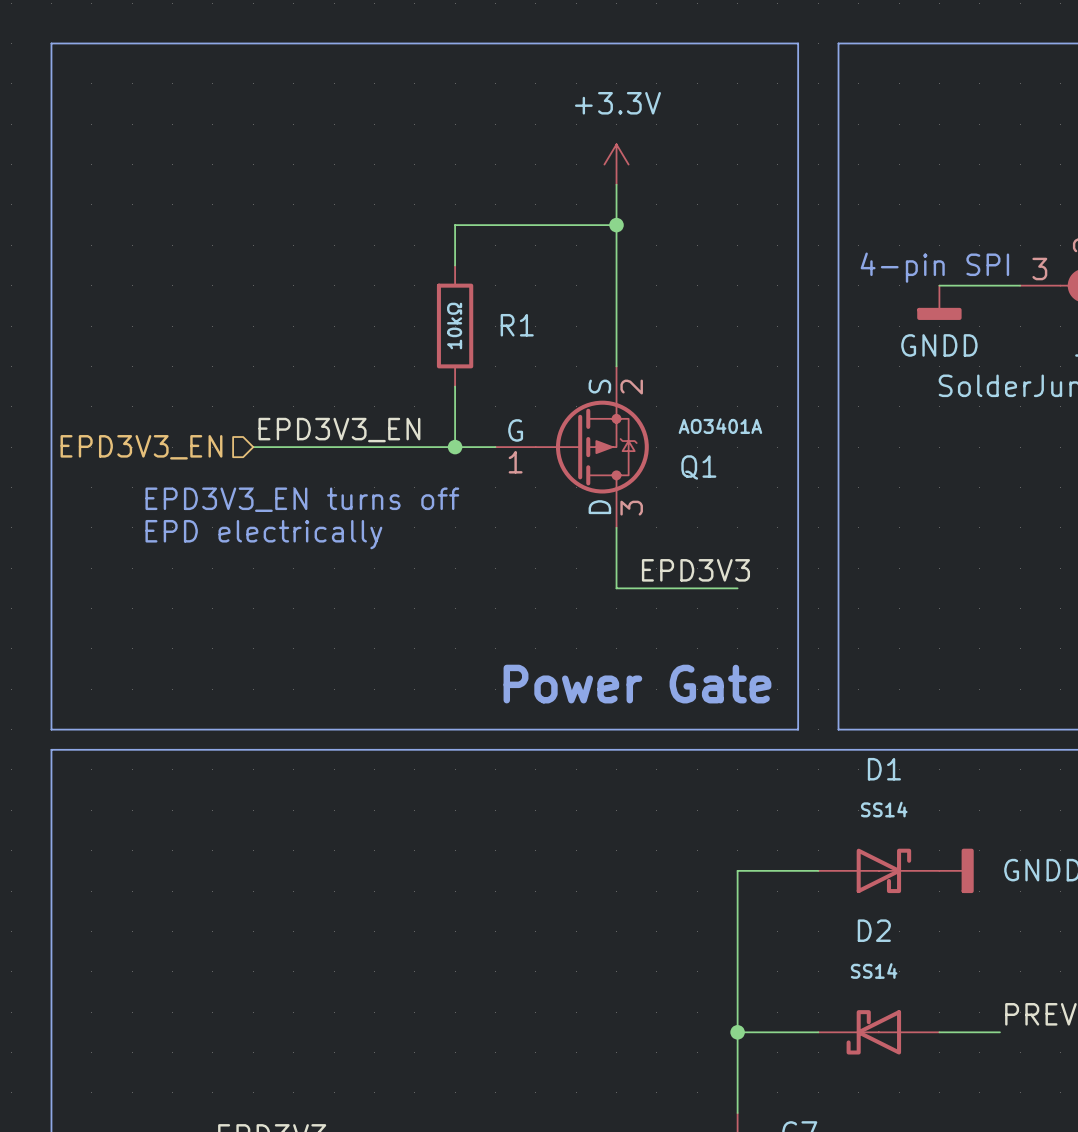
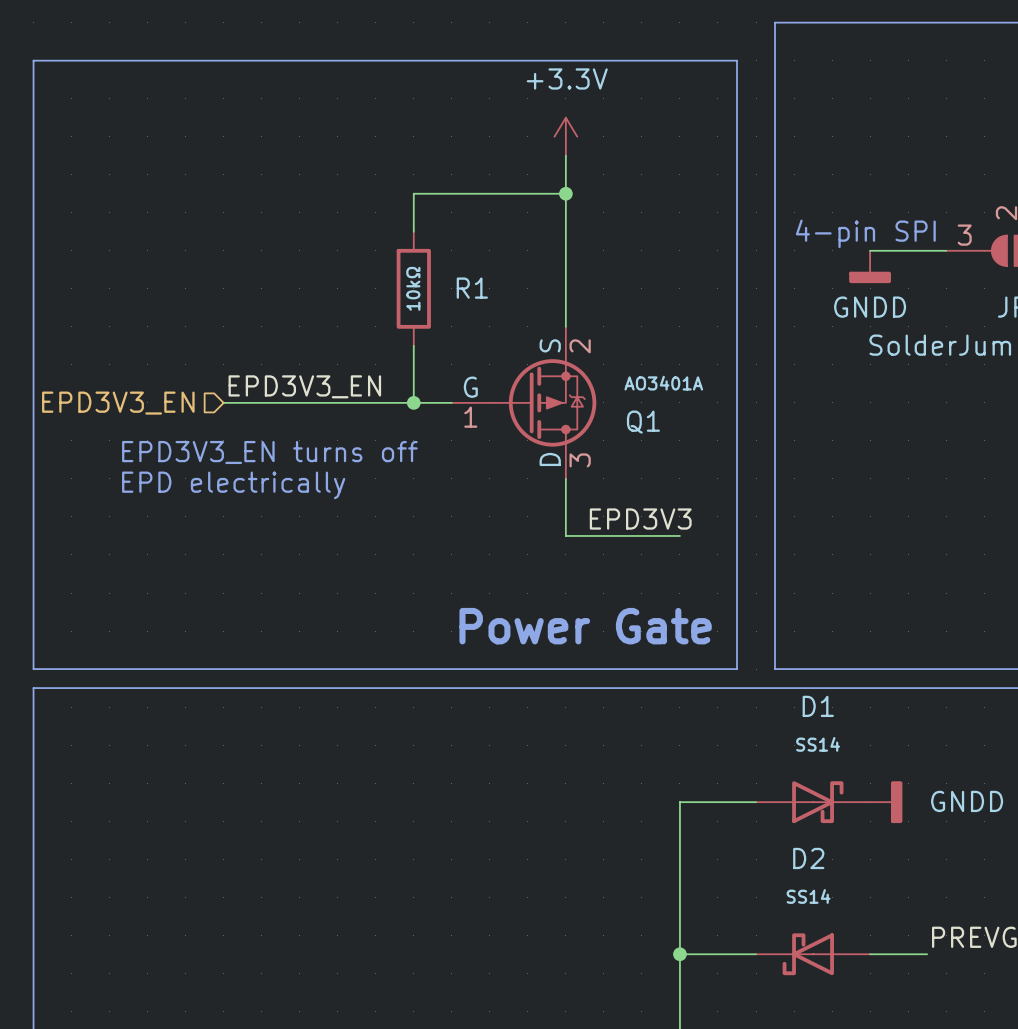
line: (51, 83) (51, 43) (798, 43) (798, 83) -> (33, 60) (736, 60)

